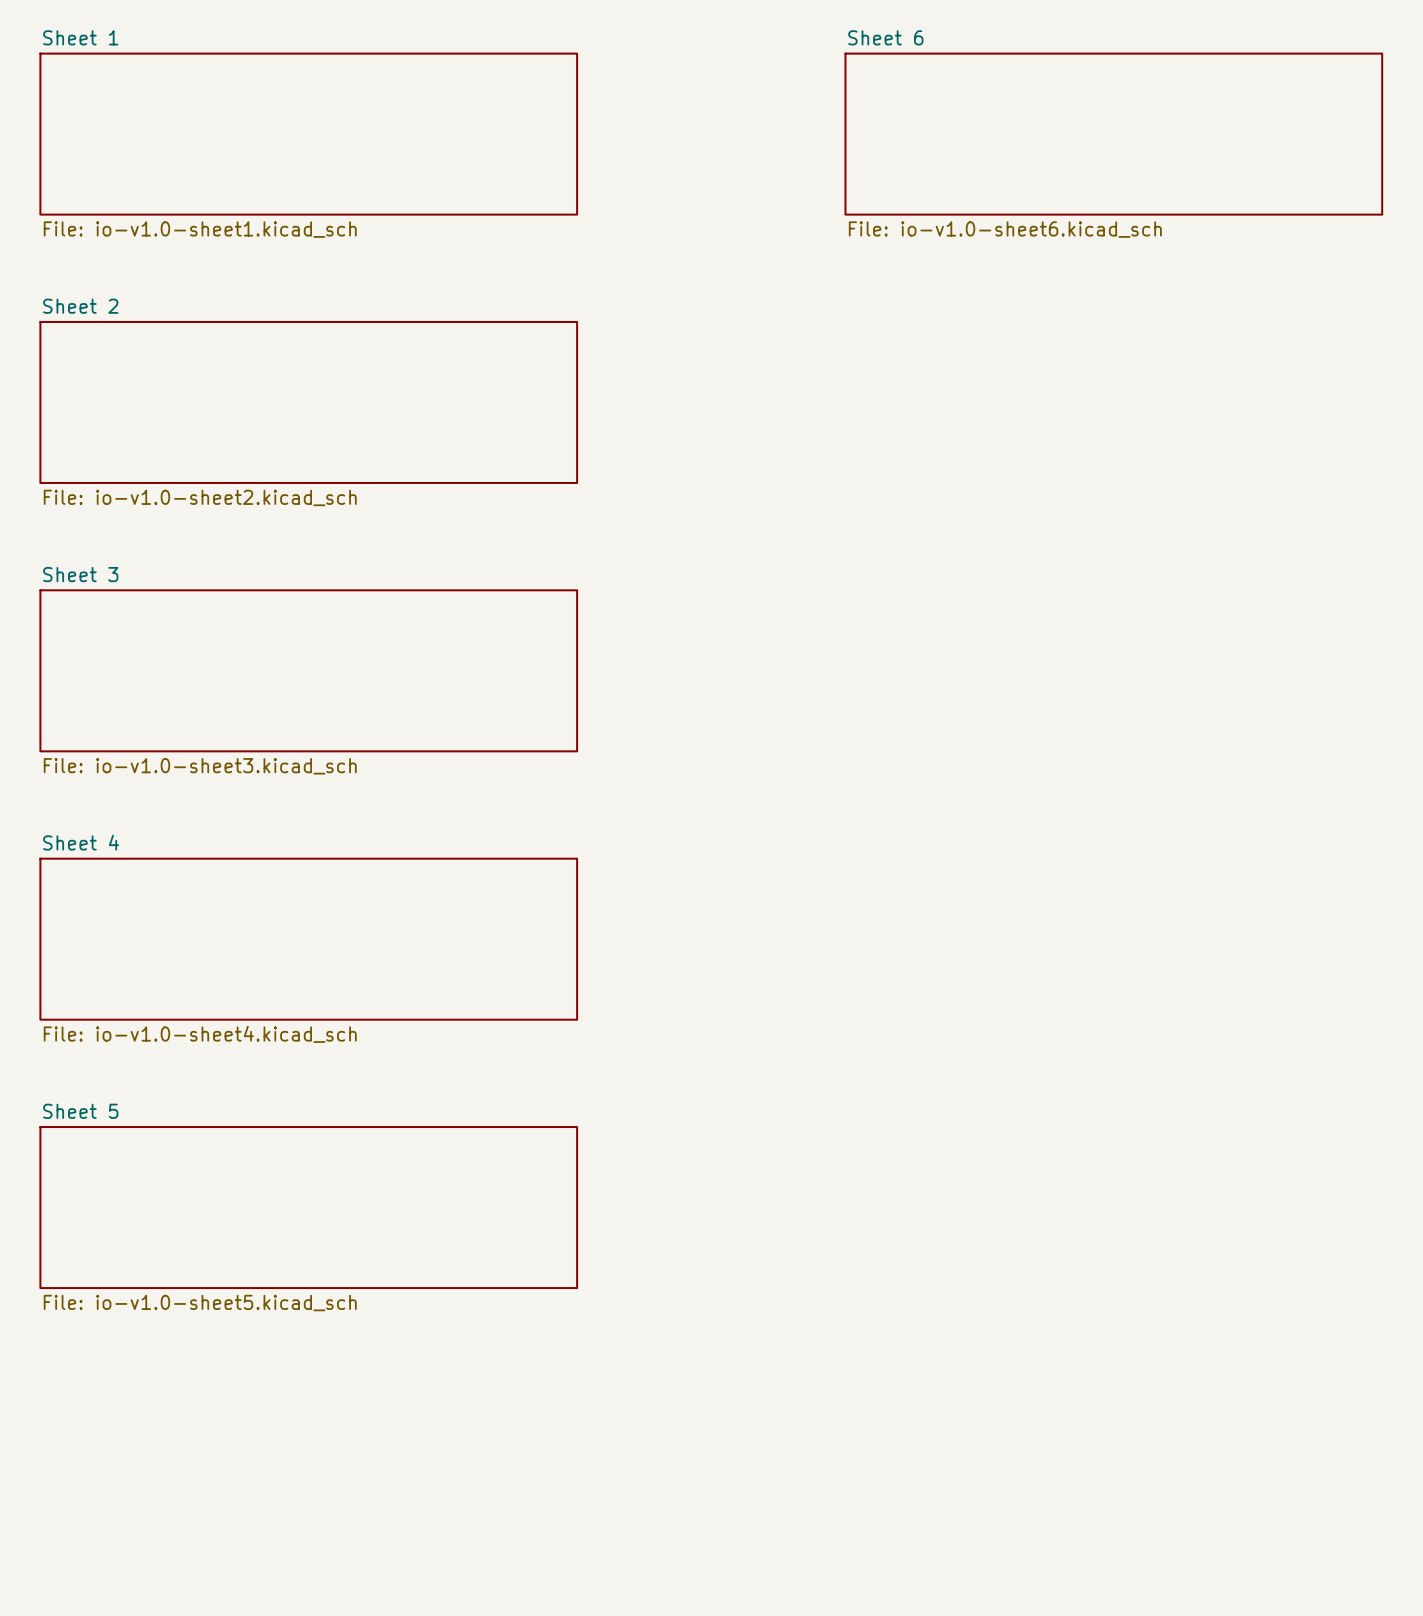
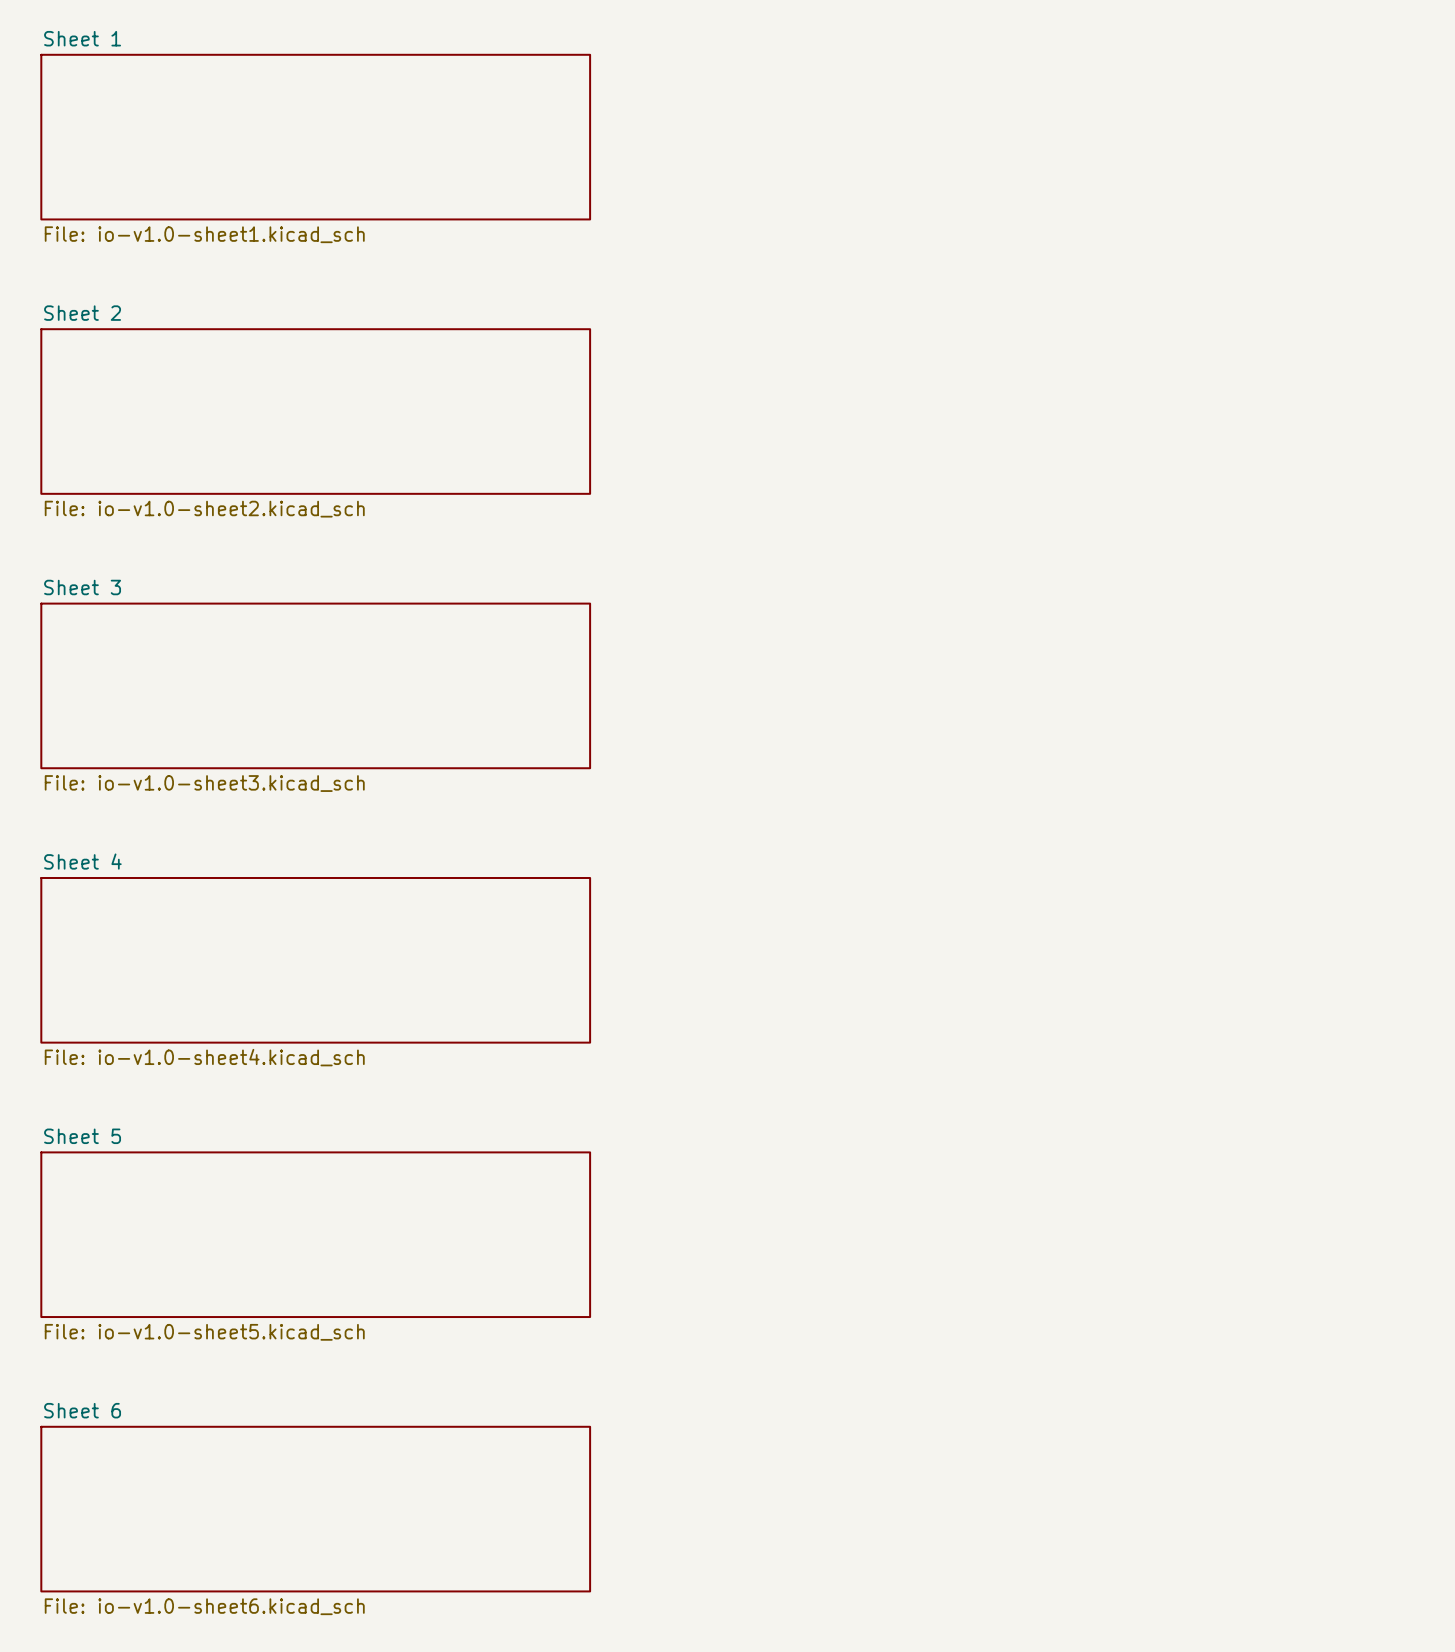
sheet Sheet 6 position: (1113, 134) -> (315, 1509)

